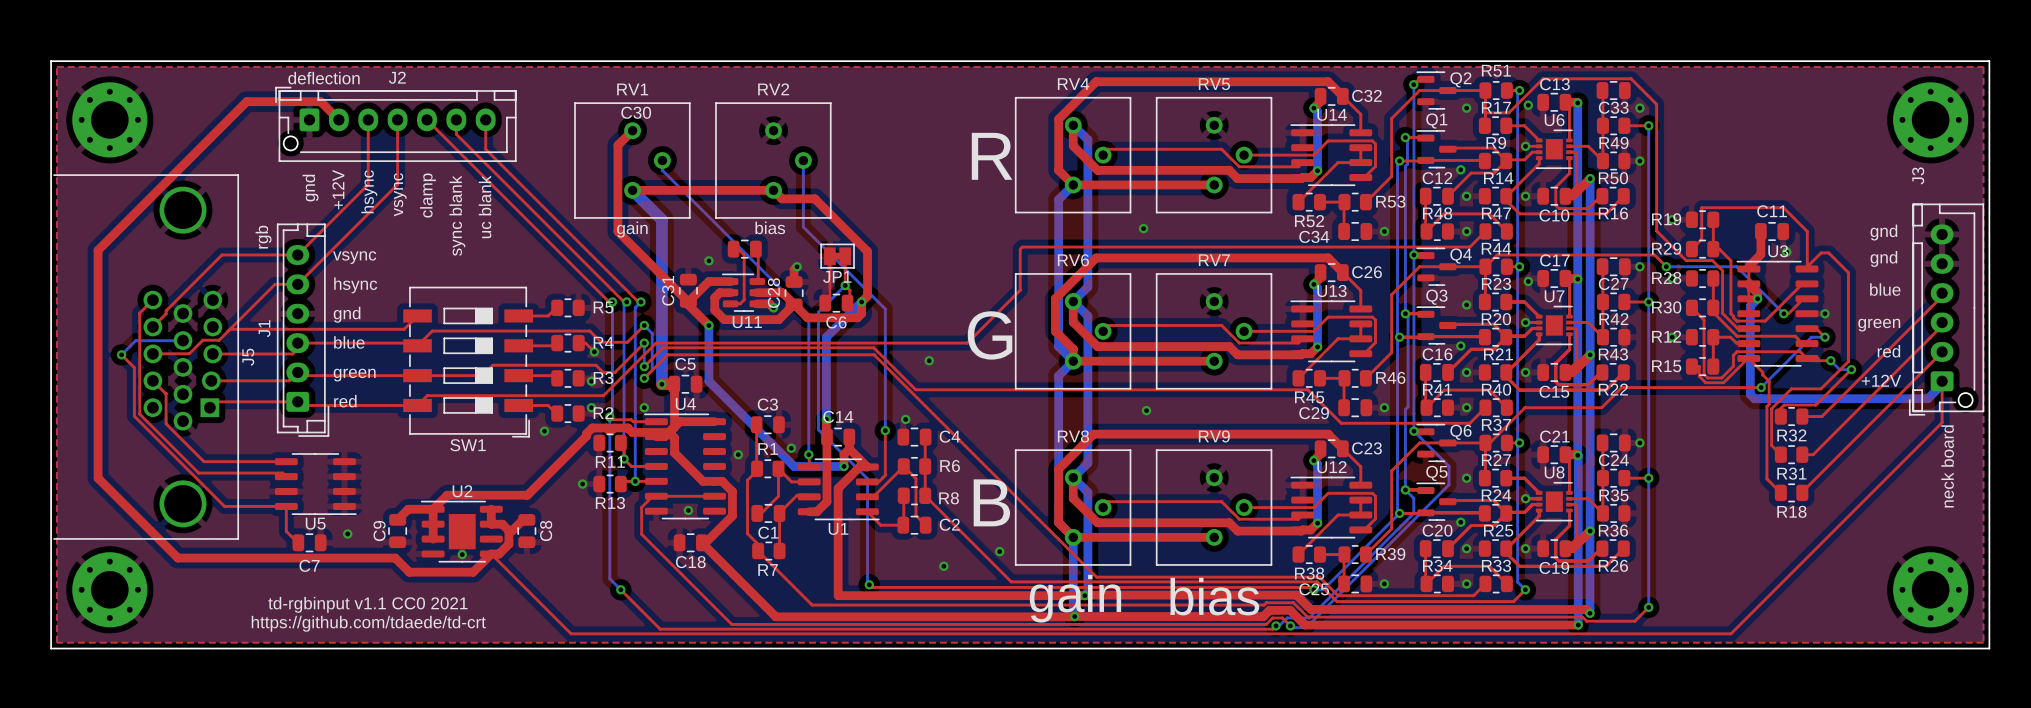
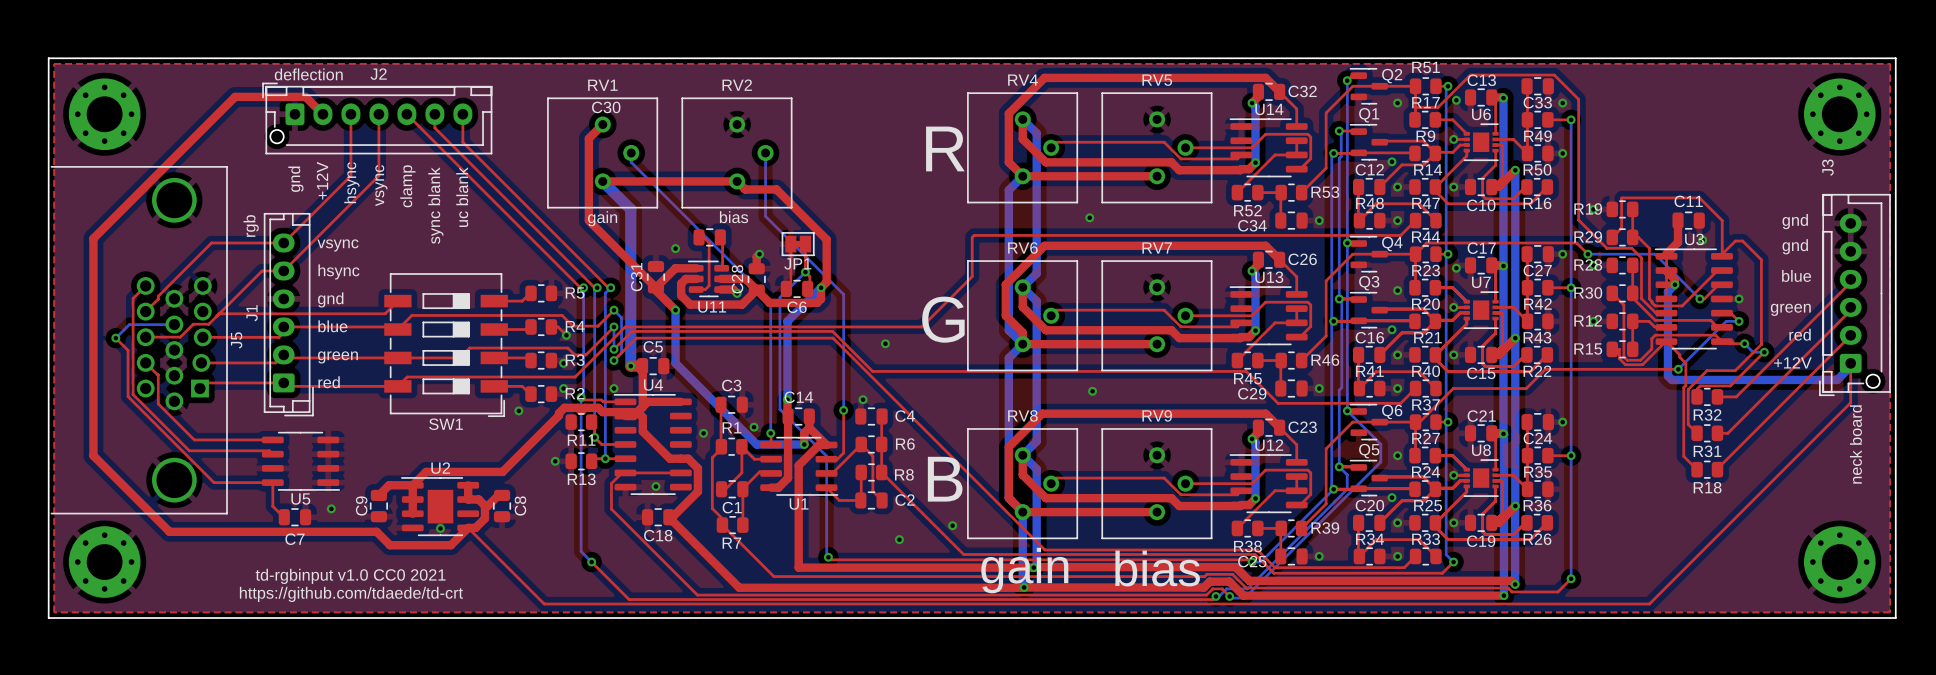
text: td-rgbinput v1.1 CC0 2021 (367, 604) -> td-rgbinput v1.0 CC0 2021 (350, 576)

